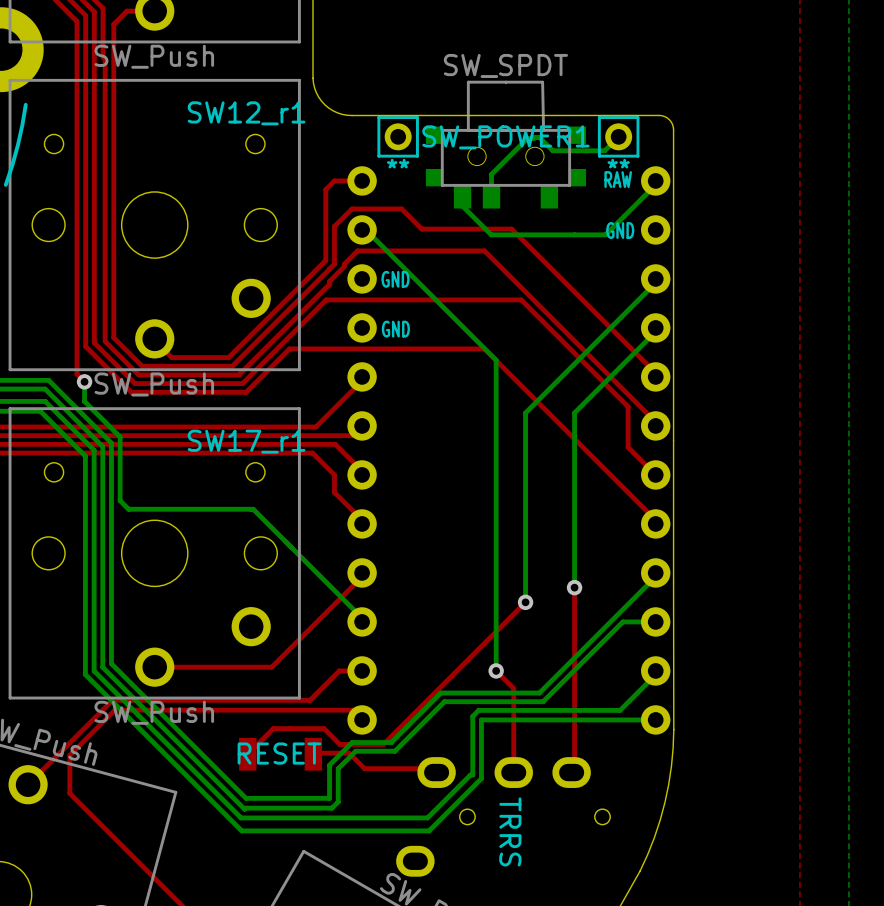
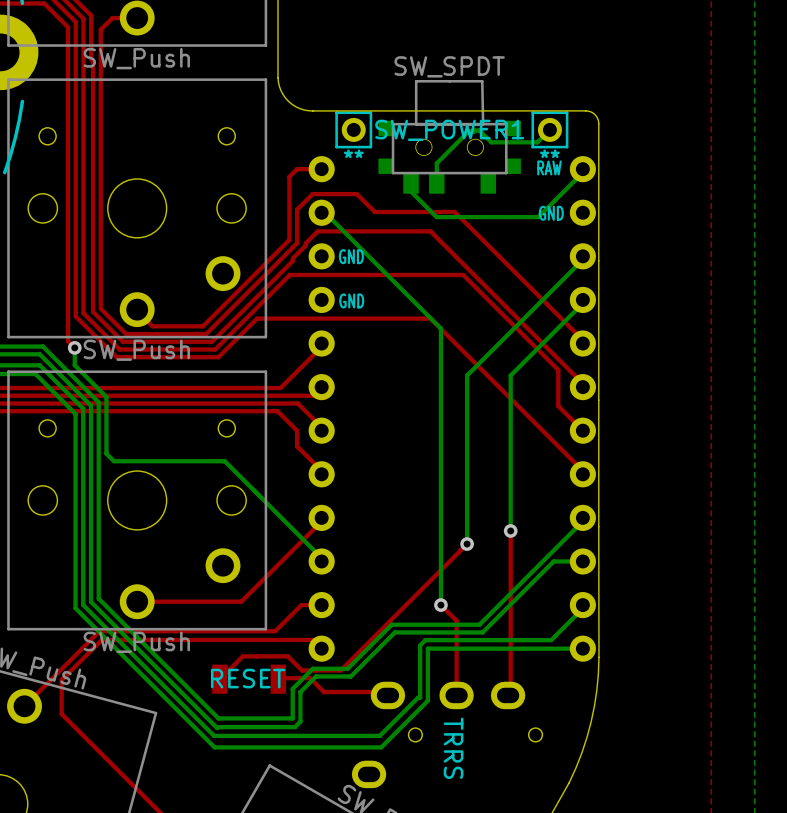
SW12_r1 name: SW12_r1 (246, 113) -> none
SW17_r1 name: SW17_r1 (246, 441) -> none

